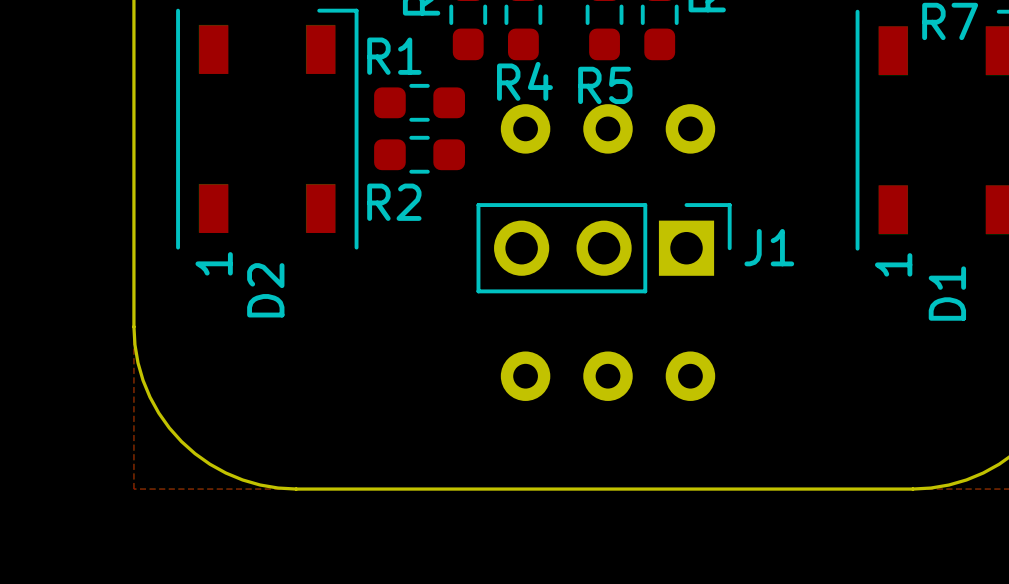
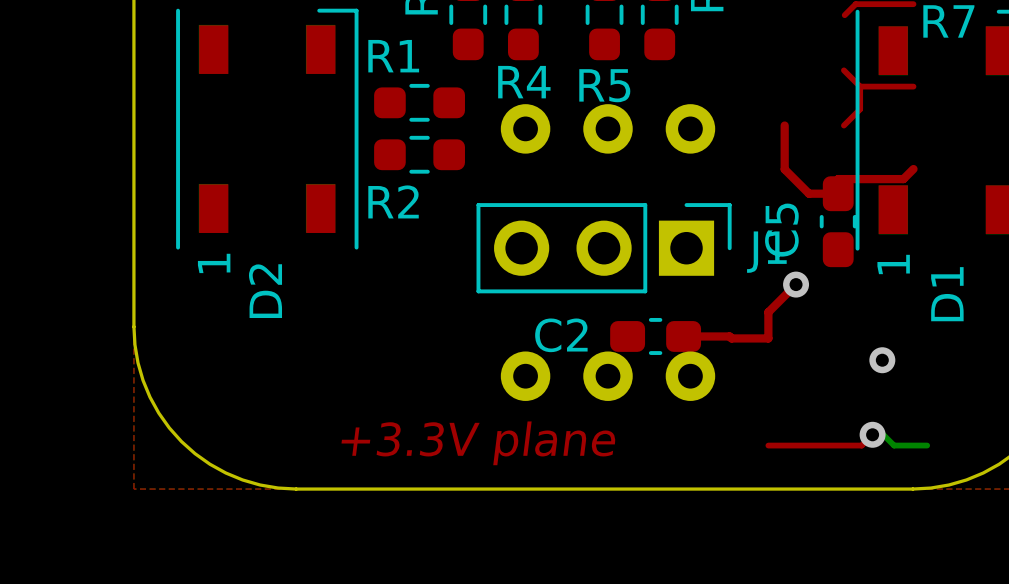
top track: none -> (913, 4) (855, 4) (844, 15)
top track: none -> (843, 70) (860, 86)
top track: none -> (860, 86) (913, 86)
top track: none -> (860, 86) (860, 109) (843, 125)
top track: none -> (784, 125) (784, 169) (809, 193) (838, 193) (838, 179) (903, 179) (913, 169)
C5: none -> (838, 221)
top track: none -> (796, 284) (768, 312) (768, 338) (683, 336)
via: none -> (796, 284)
C2: none -> (655, 336)
via: none -> (882, 360)
top track: none -> (872, 434) (861, 445) (768, 445)
bottom track: none -> (872, 434) (883, 434) (894, 445) (927, 445)
via: none -> (872, 434)
text: none -> +3.3V plane (478, 443)

